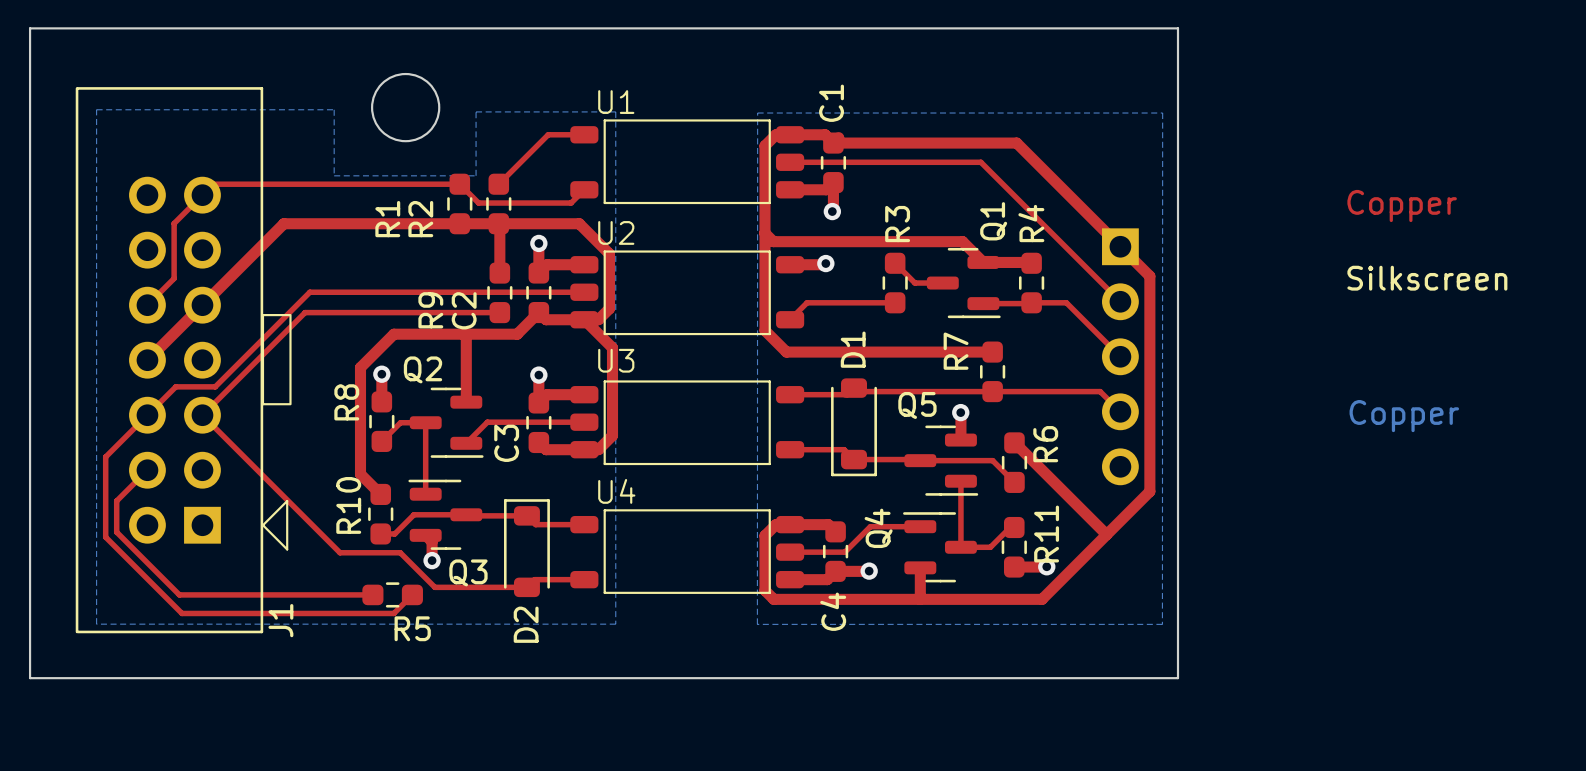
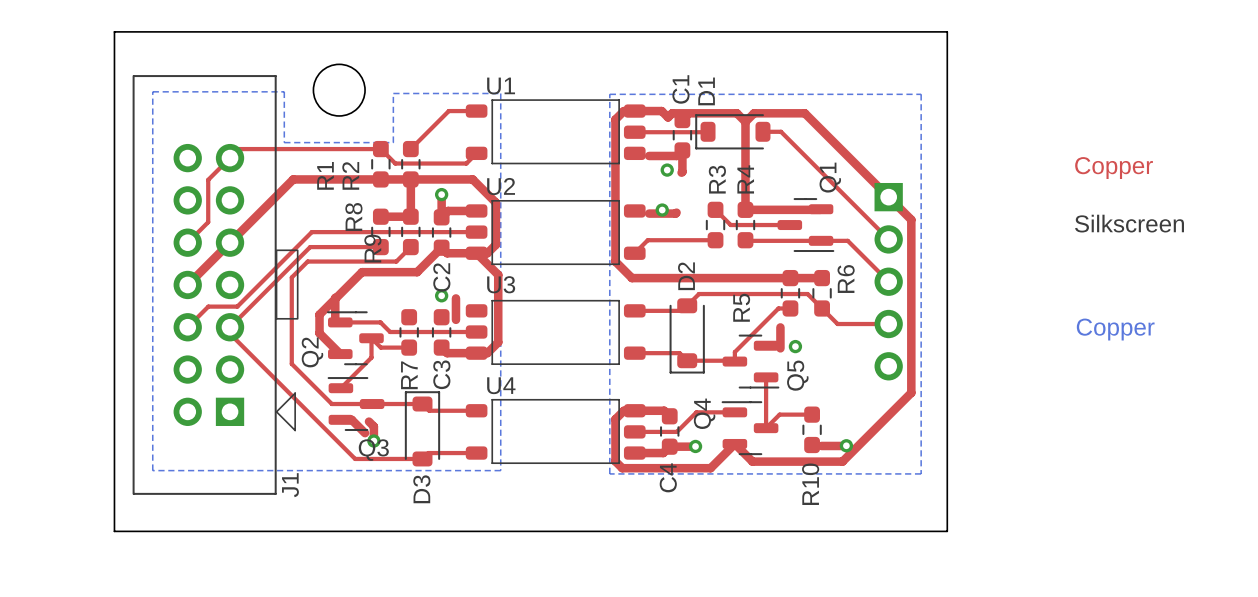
board edge: (94, 28) (30, 28) (30, 678) (94, 678) -> (114, 31) (114, 531)
round board edge position: (405, 107) -> (339, 90)
bottom zone outline: (96, 109) (96, 624) (615, 624) (615, 111) (476, 111) (476, 175) (334, 175) (334, 109) (96, 109) -> (152, 91) (152, 470) (500, 470) (500, 93) (393, 93) (393, 142) (284, 142) (284, 91) (152, 91)
bottom zone outline: (757, 113) (757, 624) (1162, 624) (1162, 113) (757, 113) -> (609, 94) (609, 473) (921, 473) (921, 94) (609, 94)
top track: (584, 134) (548, 134) (498, 184) -> (476, 111) (448, 111) (410, 149)
top track: none -> (745, 121) (736, 113) (672, 113) (668, 117) (661, 111) (623, 111) (615, 119) (615, 261) (631, 278) (822, 278)
top track: none -> (745, 121) (745, 209) (821, 209)
top track: none -> (745, 121) (754, 113) (804, 113) (911, 219) (911, 392) (842, 461) (752, 461) (734, 443) (710, 468) (622, 468) (615, 461) (615, 419) (623, 410) (664, 410) (669, 416)
top track: none -> (708, 131) (634, 132)
top track: none -> (762, 131) (781, 131) (888, 239)
U1 position: (687, 161) -> (555, 131)
top track: (790, 162) (980, 162) (1120, 301) -> none
top track: none -> (476, 153) (466, 163) (395, 163) (380, 149) (239, 149) (208, 179) (208, 222) (187, 242)
top track: (584, 189) (571, 203) (478, 203) (459, 184) (213, 184) (174, 223) (174, 278) (147, 305) -> none
R1 position: (459, 203) -> (380, 164)
R2 position: (498, 203) -> (410, 164)
via position: (832, 211) -> (667, 170)
top track: none -> (410, 179) (410, 216) (380, 216)
top track: (498, 223) (499, 273) -> none
top track: (764, 233) (773, 241) (962, 241) (983, 262) (1031, 263) -> none
top track: (538, 243) (538, 273) (547, 264) (584, 264) -> (441, 194) (441, 217) (448, 210) (476, 210)
via position: (538, 243) -> (441, 194)
top track: none -> (715, 209) (730, 225) (789, 225)
via position: (825, 263) -> (662, 210)
top track: (895, 263) (914, 283) (942, 283) -> none
R3 position: (895, 283) -> (715, 225)
Q1 position: (963, 283) -> (805, 225)
R4 position: (1031, 283) -> (745, 225)
top track: none -> (476, 232) (311, 232) (237, 306) (208, 306) (187, 327)
R9 position: (499, 292) -> (410, 231)
C2 position: (538, 292) -> (441, 232)
top track: (584, 292) (309, 292) (215, 386) (175, 386) (105, 456) (105, 537) (181, 613) (393, 613) (412, 594) -> none
U2 position: (687, 292) -> (555, 232)
top track: none -> (745, 240) (847, 240) (888, 281)
top track: (895, 302) (807, 302) (790, 319) -> (715, 240) (647, 240) (634, 253)
top track: (983, 303) (1066, 302) (1120, 356) -> none
top track: none -> (380, 247) (310, 247) (230, 327) (230, 333) (355, 458) (422, 458) (428, 453) (476, 453)
top track: none -> (410, 247) (396, 261) (307, 261) (291, 277) (291, 363) (331, 404) (422, 404) (429, 410) (476, 410)
C2 name position: C2 (464, 310) -> C2 (441, 277)
top track: (499, 312) (305, 312) (202, 415) (340, 552) (400, 552) (434, 587) (526, 587) (534, 579) (584, 579) -> none
top track: (584, 319) (612, 347) (612, 435) (598, 449) (546, 449) (538, 442) -> (476, 253) (498, 274) (498, 342) (487, 353) (447, 353) (441, 347)
top track: (467, 334) (466, 402) -> none
R7 name position: R7 (956, 351) -> R7 (409, 375)
top track: (992, 352) (786, 352) (764, 330) (764, 145) (776, 134) (825, 134) (833, 143) (1016, 143) (1149, 276) (1149, 491) (1042, 599) (773, 599) (764, 590) (764, 535) (776, 524) (828, 524) (835, 531) -> none
part position: (1120, 356) -> (888, 281)
top track: none -> (187, 284) (293, 179) (472, 179) (495, 202) (495, 244) (487, 253) (447, 253) (441, 247) (417, 272) (362, 272) (319, 314) (319, 333) (340, 354)
top track: (147, 360) (283, 223) (579, 223) (609, 253) (609, 308) (598, 319) (546, 319) (538, 312) (517, 334) (393, 334) (360, 367) (360, 474) (380, 494) -> none
J1 position: (183, 360) -> (215, 284)
Q2 name position: Q2 (422, 369) -> Q2 (312, 352)
R7 position: (992, 371) -> (409, 332)
via: (381, 374) -> none
via position: (538, 375) -> (441, 295)
top track: none -> (790, 308) (778, 308) (734, 352) (734, 361) (687, 360) (679, 353) (634, 353)
top track: none -> (634, 310) (682, 310) (698, 294) (807, 294) (837, 324) (888, 324)
top track: (584, 394) (547, 394) (538, 402) (537, 401) -> none
top track: (790, 394) (847, 394) (854, 388) (857, 391) (1100, 391) (1120, 411) -> none
Q5 name rotation: 0° (917, 405) -> 90° counterclockwise (797, 375)
Q5 name position: Q5 (917, 405) -> Q5 (797, 375)
top track: none -> (340, 322) (380, 322) (390, 332) (476, 332)
via position: (960, 412) -> (795, 346)
R8 position: (381, 421) -> (380, 231)
Q2 rotation: 0° (446, 422) -> 180° (355, 338)
C3 position: (538, 422) -> (441, 332)
top track: (584, 422) (487, 422) (466, 443) -> none
U3 position: (687, 422) -> (555, 332)
D1 rotation: 0° (854, 427) -> 90° clockwise (732, 131)
D1 position: (854, 427) -> (732, 131)
top track: none -> (409, 347) (380, 347) (371, 338) (371, 357) (340, 388)
top track: (381, 441) (400, 422) (425, 422) (425, 494) -> none
top track: (1014, 442) (1106, 534) -> none
C3 name position: C3 (506, 443) -> C3 (441, 374)
top track: (790, 449) (844, 449) (854, 459) (992, 460) (1014, 482) -> none
Q5 position: (941, 460) -> (750, 361)
R6 position: (1014, 462) -> (822, 293)
top track: (147, 470) (116, 500) (116, 532) (179, 594) (372, 594) -> none
top track: none -> (766, 377) (766, 428) (779, 414) (812, 414)
top track: (960, 481) (960, 547) (990, 547) (1010, 527) (1014, 527) -> none
R10 name position: R10 (348, 505) -> R10 (810, 484)
R10 position: (380, 514) -> (812, 429)
Q3 position: (445, 514) -> (356, 404)
top track: (584, 524) (535, 524) (526, 515) (413, 514) (394, 533) (380, 533) -> none
top track: (920, 526) (870, 526) (844, 552) (790, 552) -> (734, 412) (696, 412) (676, 431) (634, 431)
top track: none -> (340, 419) (351, 419) (365, 433)
D3: none -> (422, 428)
Q4 position: (939, 547) -> (749, 428)
R11: (1014, 547) -> none
D2 rotation: 0° (526, 548) -> 180° (687, 335)
D2 position: (526, 548) -> (687, 335)
U4 position: (687, 551) -> (555, 431)
C4 position: (835, 551) -> (669, 431)
top track: (920, 567) (920, 599) -> none
top track: (868, 571) (835, 571) (827, 579) (790, 579) -> (695, 446) (669, 446) (663, 453) (634, 453)
via position: (869, 571) -> (695, 446)
R5 rotation: 0° (392, 594) -> 90° clockwise (790, 293)
R5 position: (392, 594) -> (790, 293)

